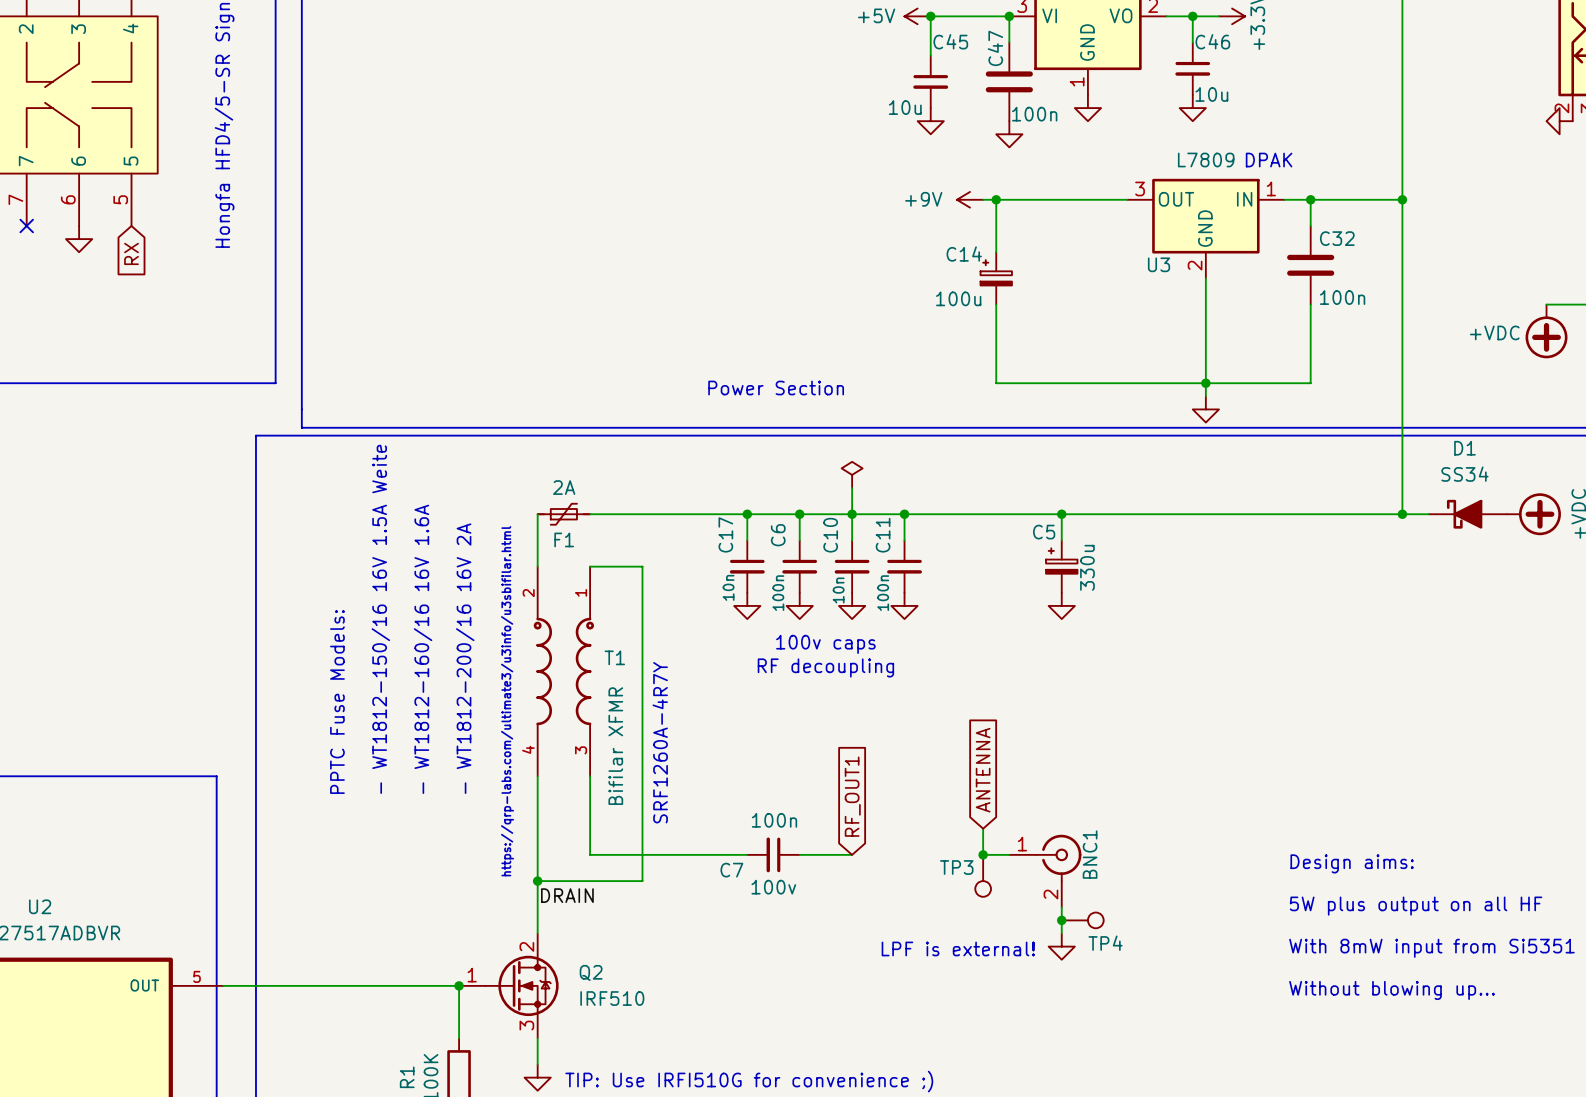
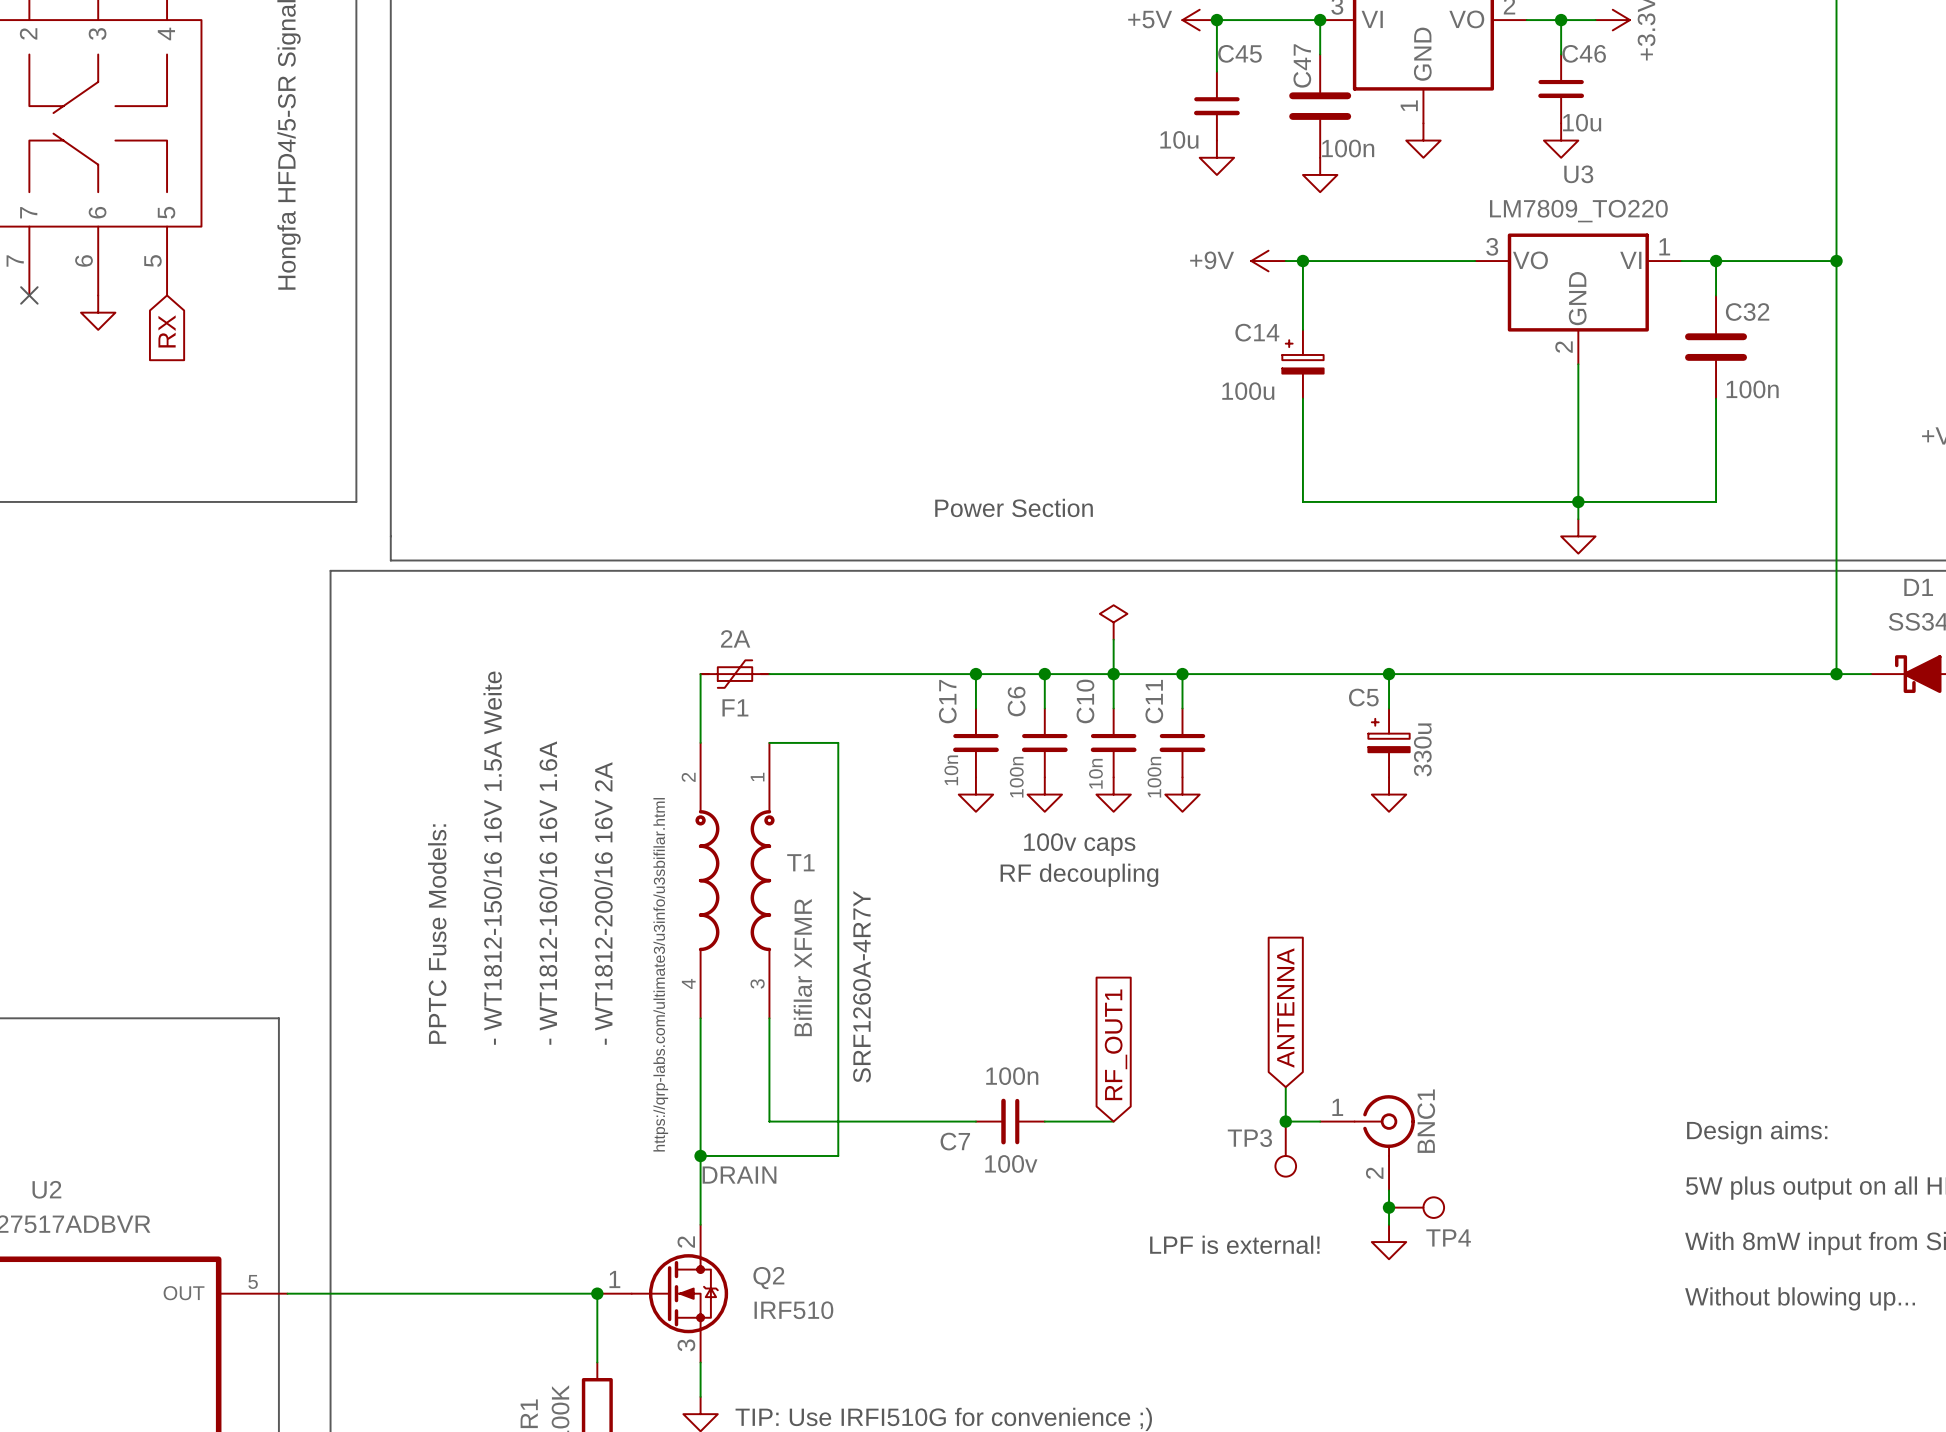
U3 value: L7809 (1206, 159) -> LM7809_TO220 (1578, 211)
text: DPAK (1269, 160) -> none
U3 pin name: OUT (1176, 199) -> VO (1530, 260)
U3 pin name: IN (1244, 199) -> VI (1630, 260)
U3 name position: U3 (1159, 264) -> U3 (1578, 174)

